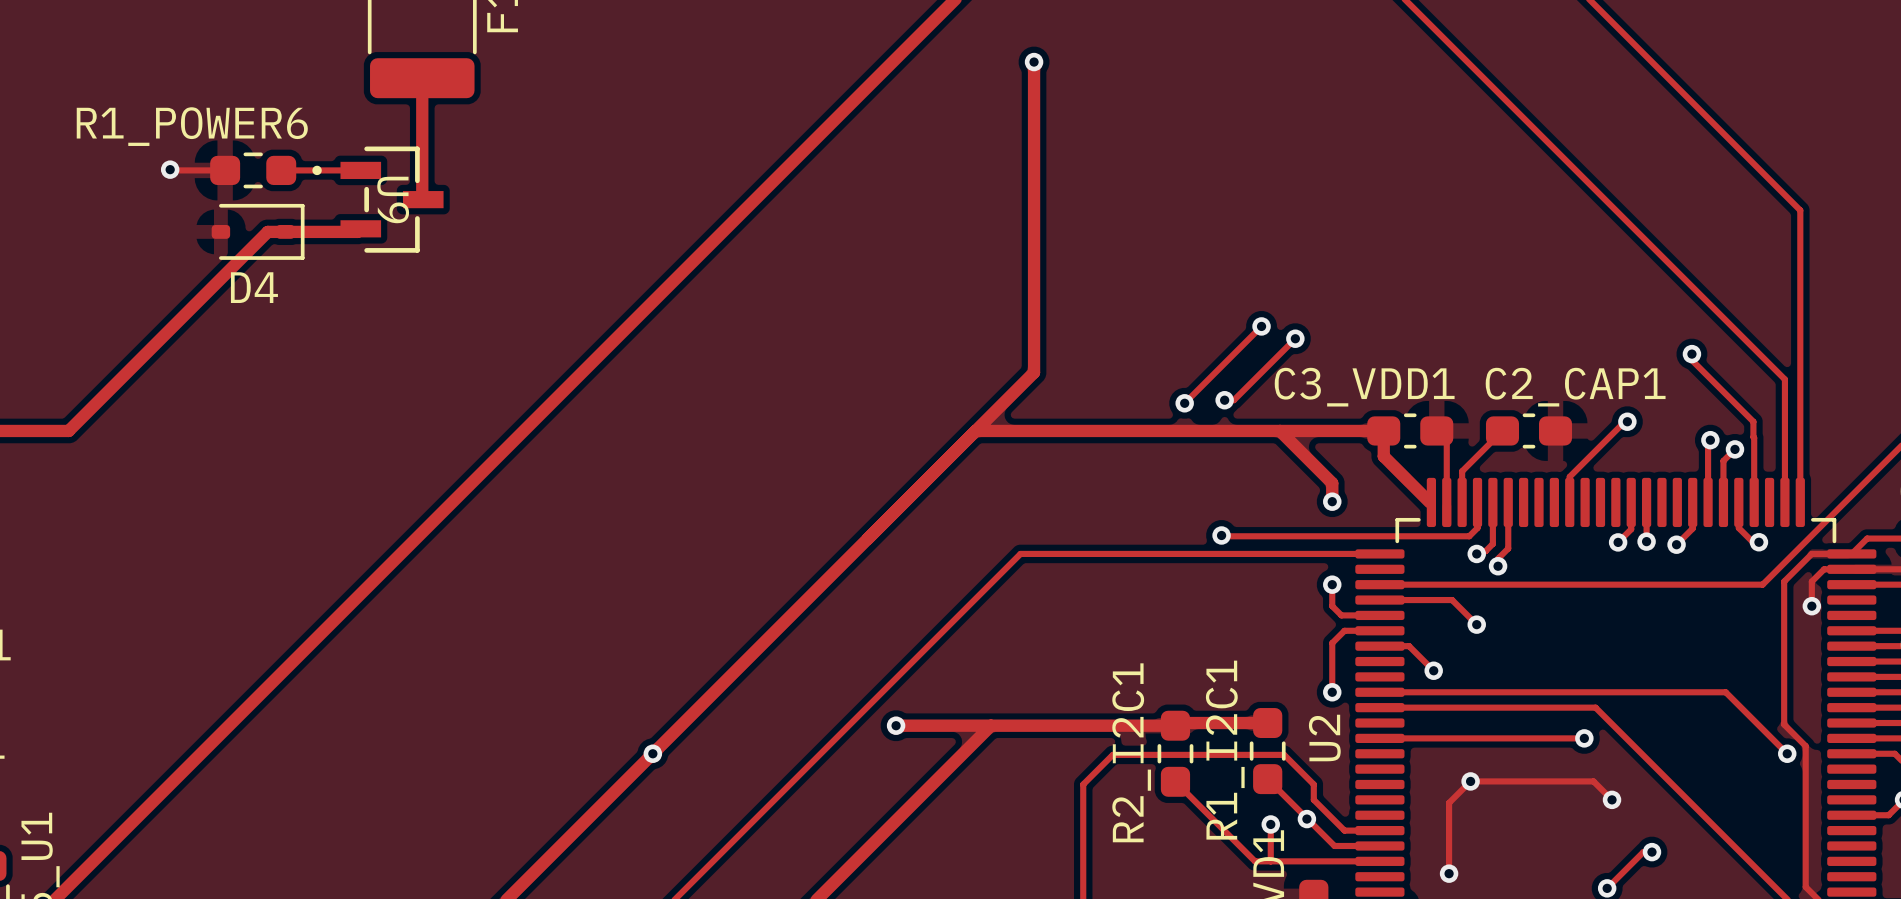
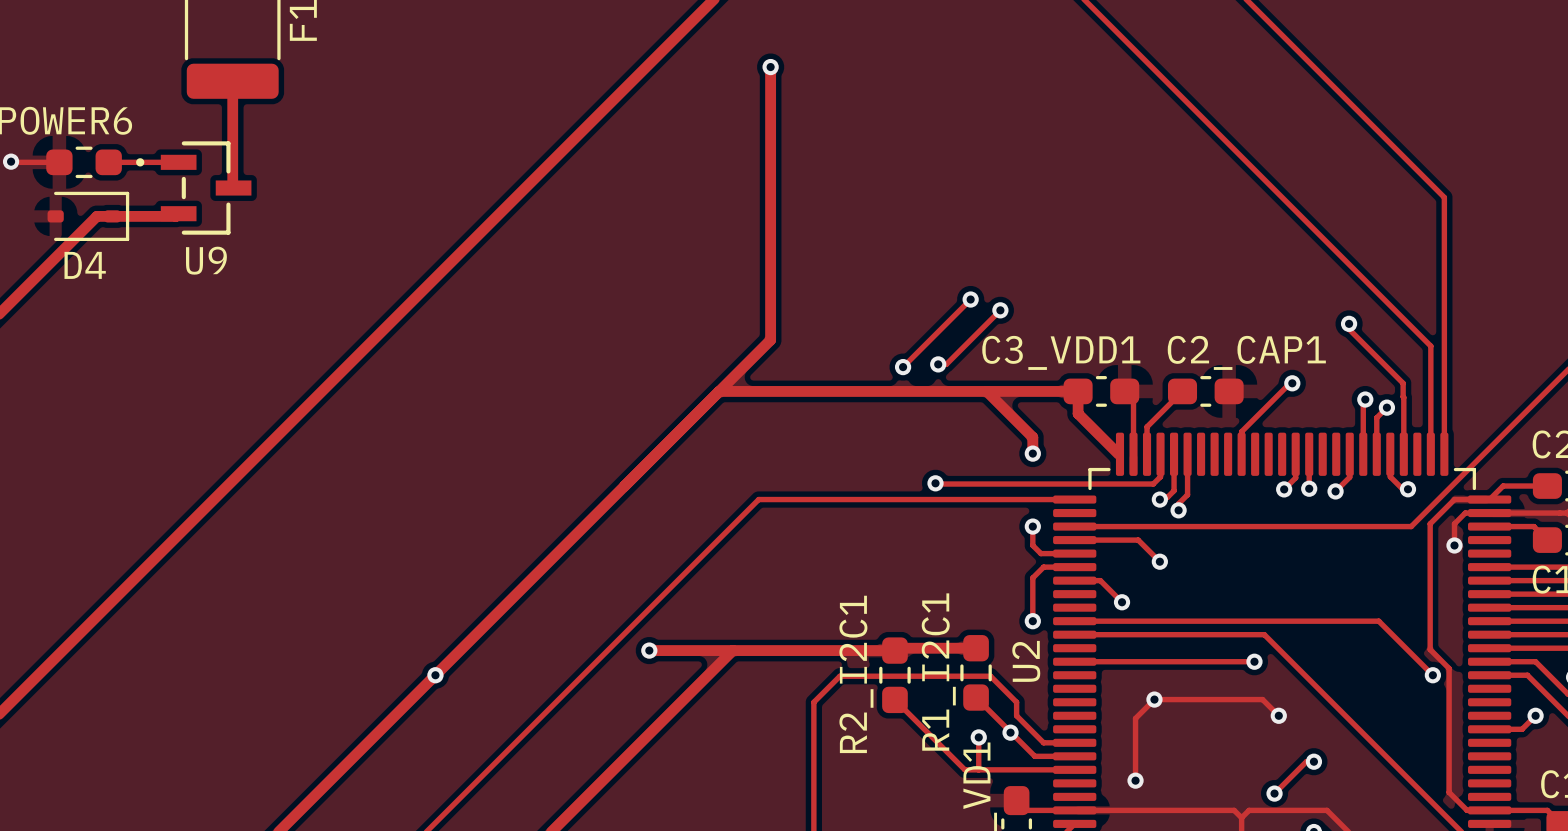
U9 name rotation: 0° (393, 199) -> 90° counterclockwise (206, 260)
U9 name position: U9 (393, 199) -> U9 (206, 260)

